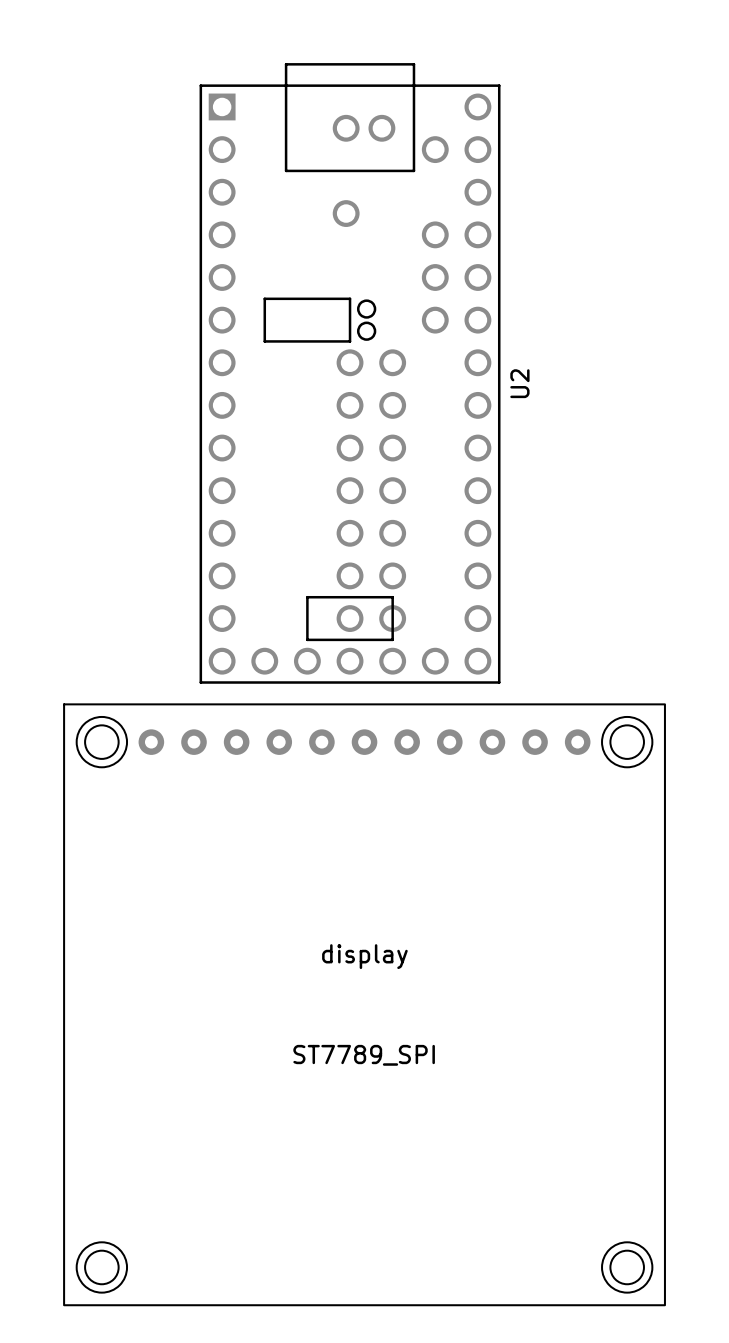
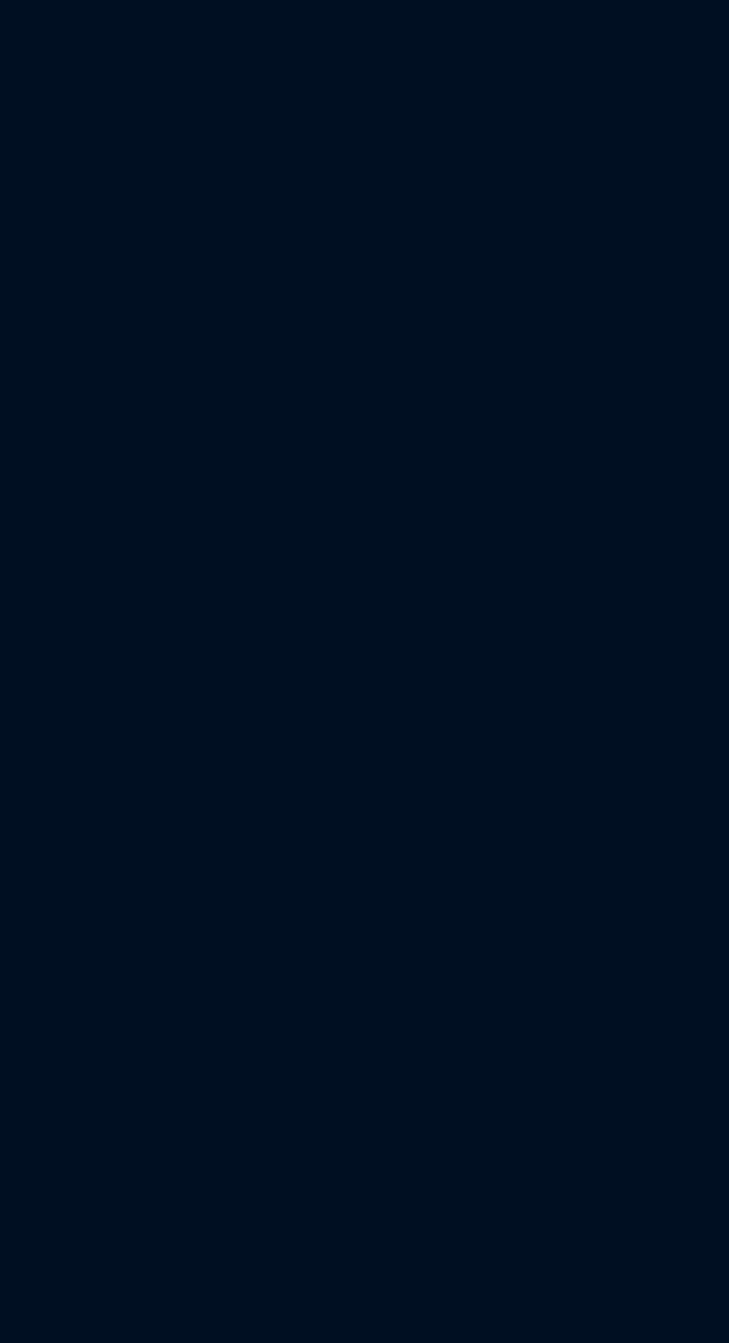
U2: (350, 373) -> none
part: ST7789_SPI (364, 1004) -> none

